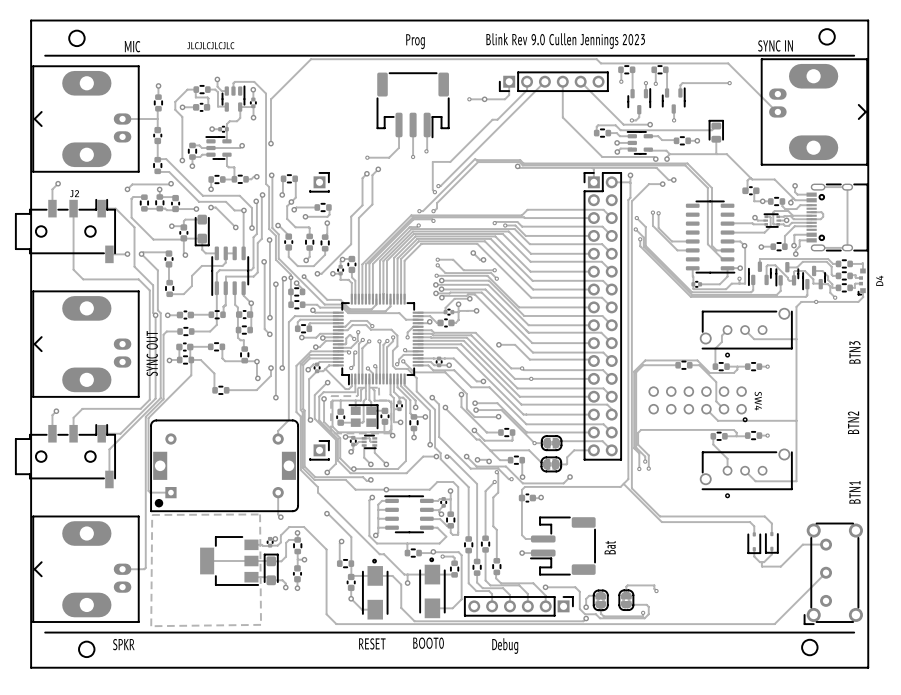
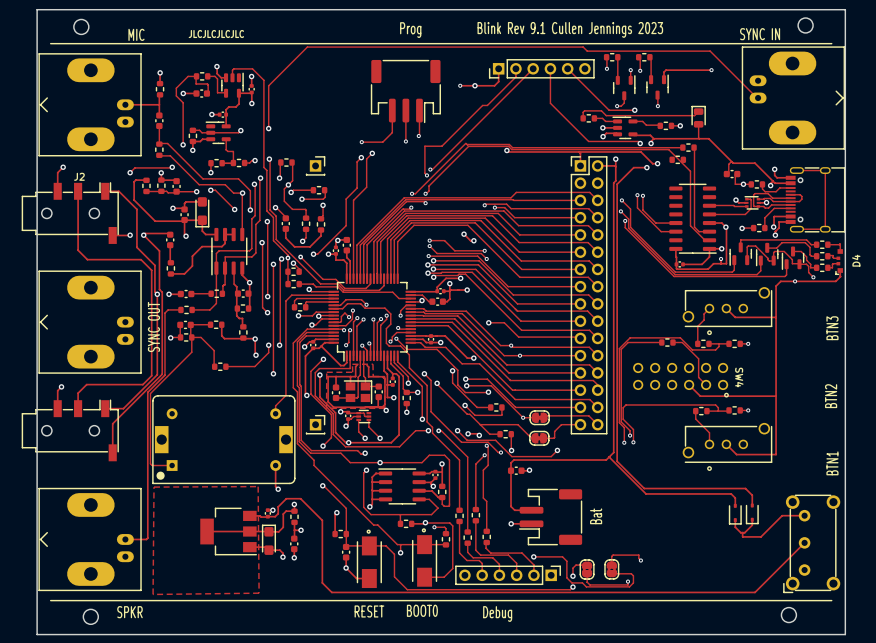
text: Blink Rev 9.0 Cullen Jennings 2023 (565, 41) -> Blink Rev 9.1 Cullen Jennings 2023 (570, 29)
track: (687, 163) (712, 188) -> (694, 147) (694, 171)
track: none -> (670, 147) (681, 147)
part: none -> (688, 147)
part: none -> (677, 159)

